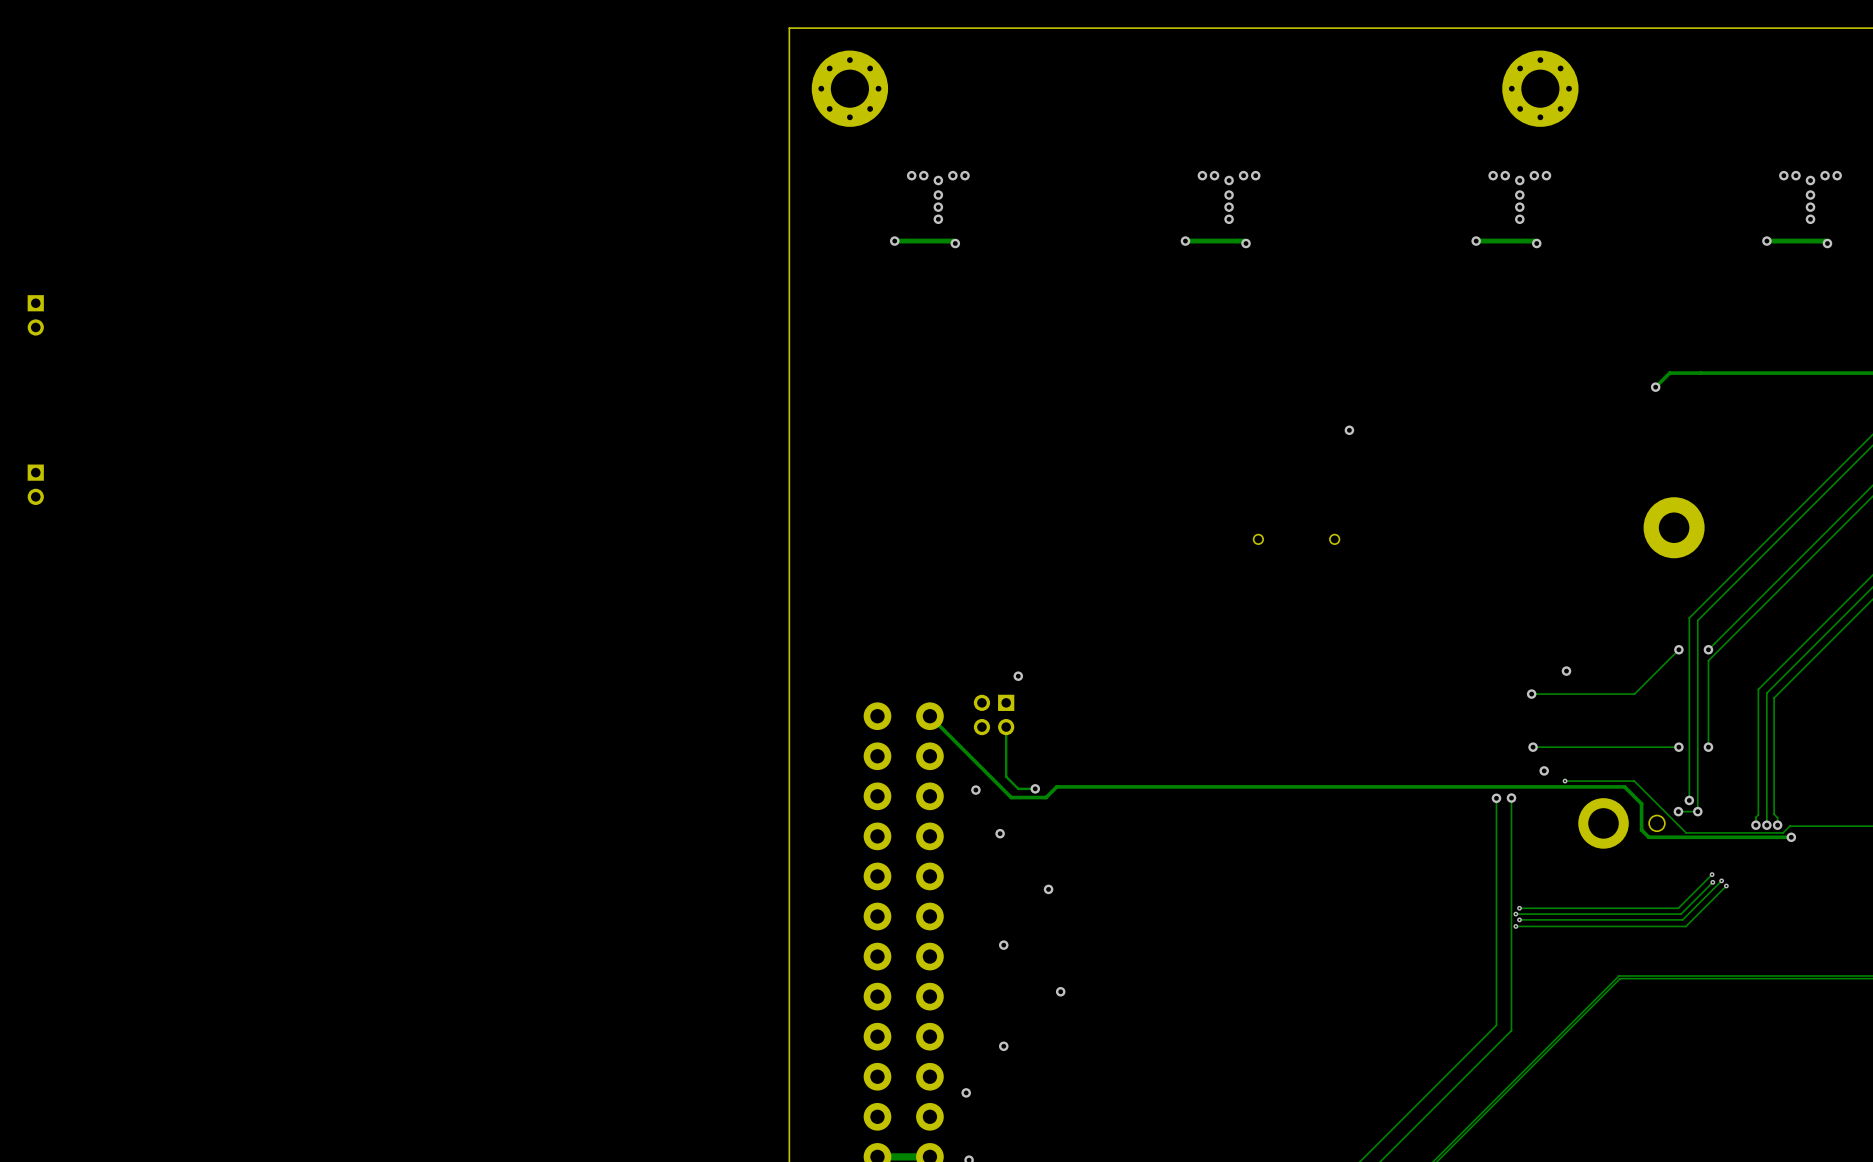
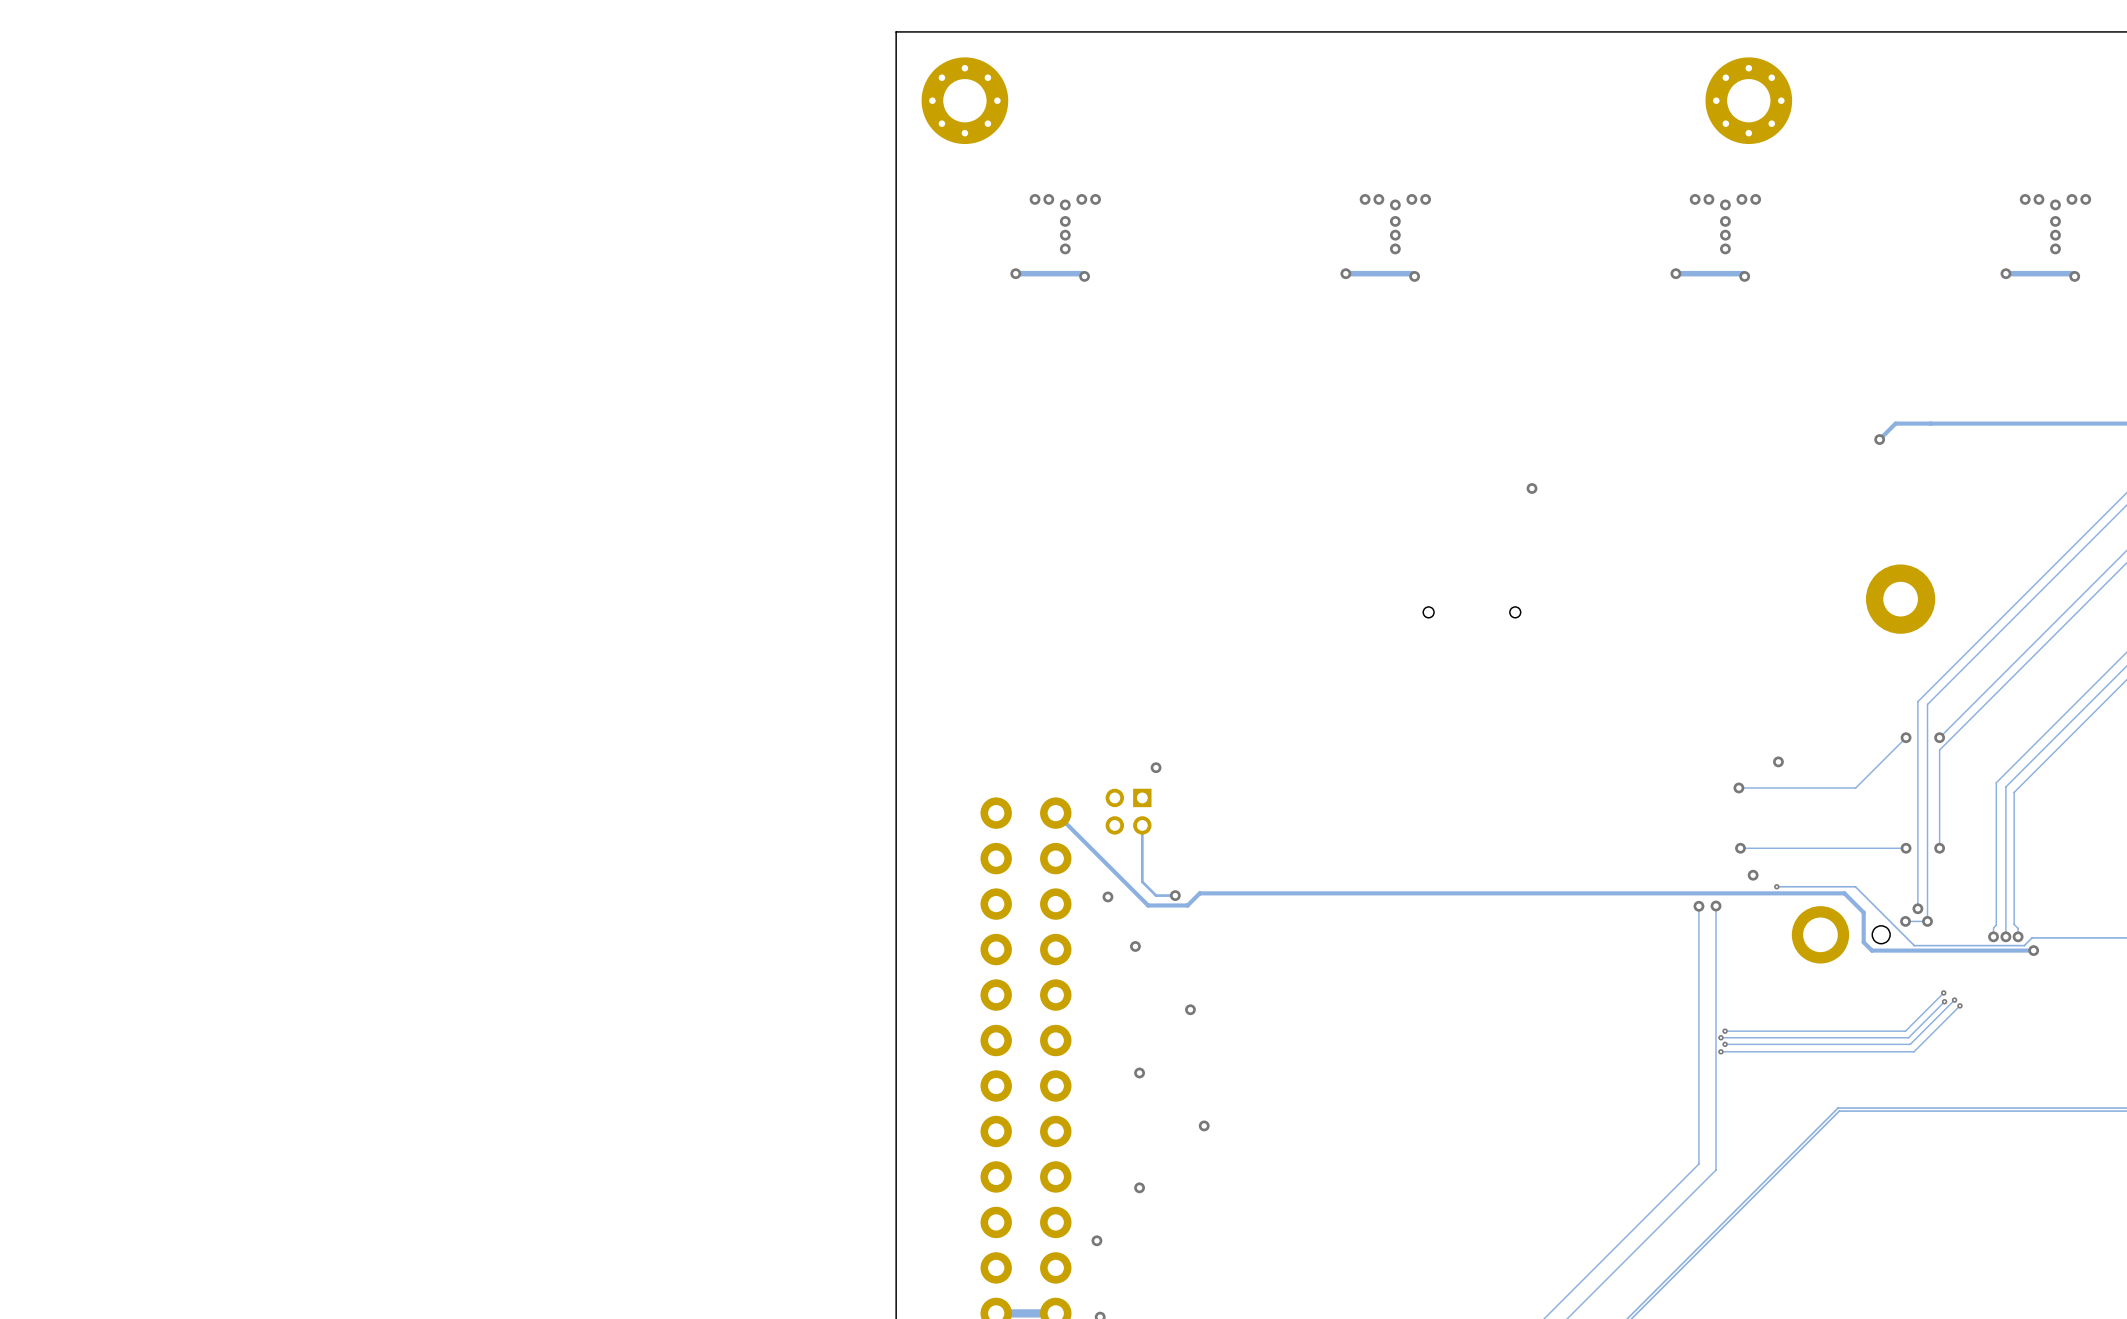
part: (35, 315) -> none
part: (35, 484) -> none

